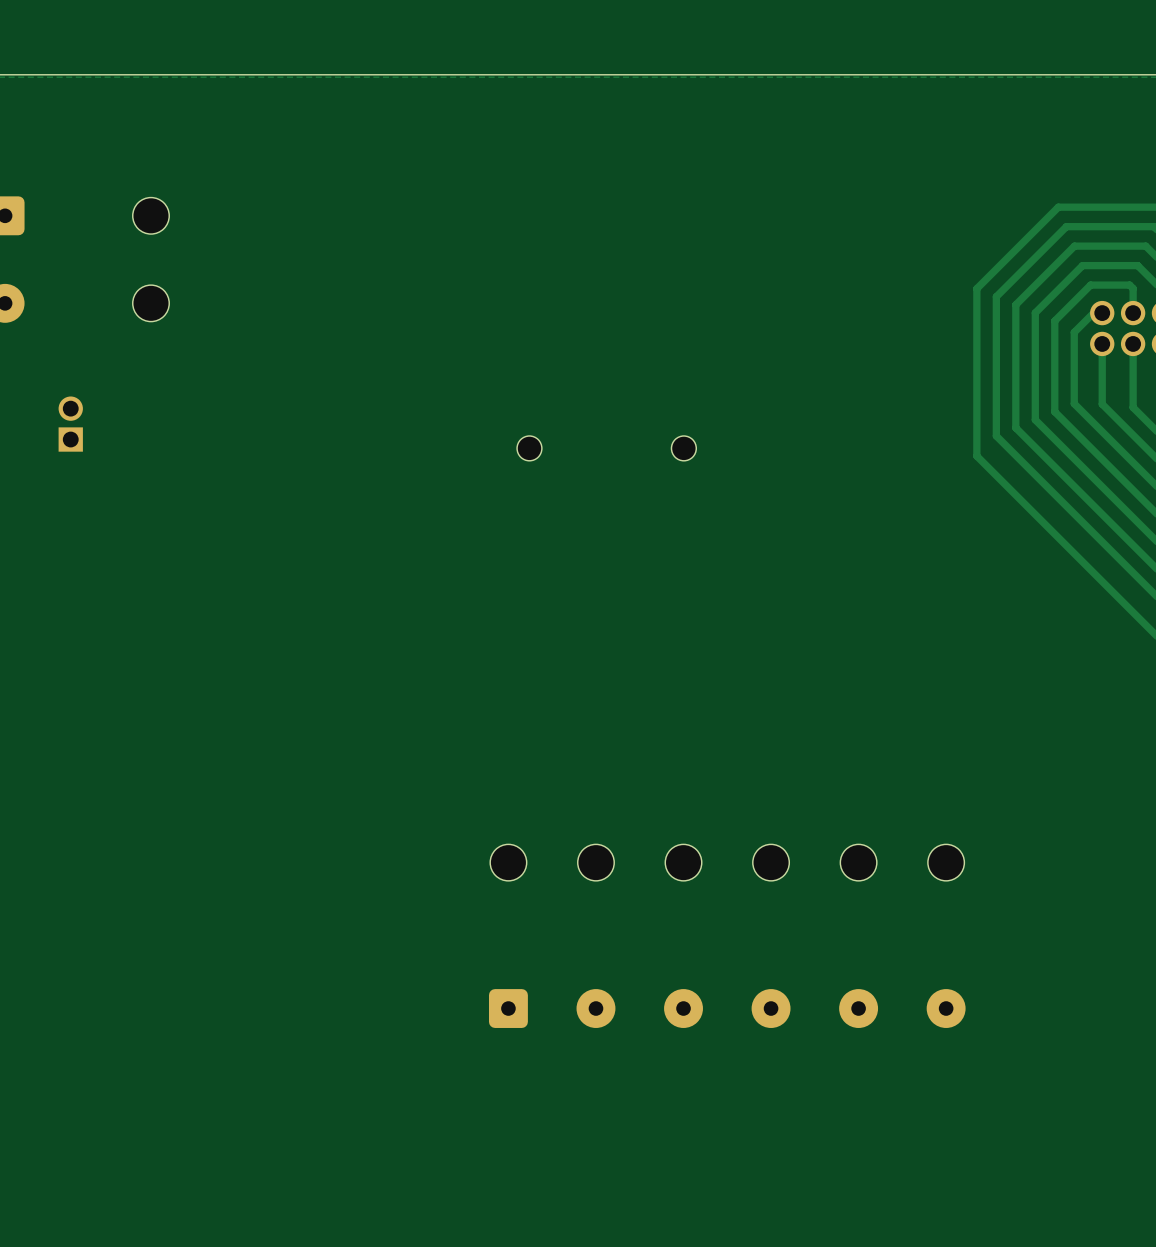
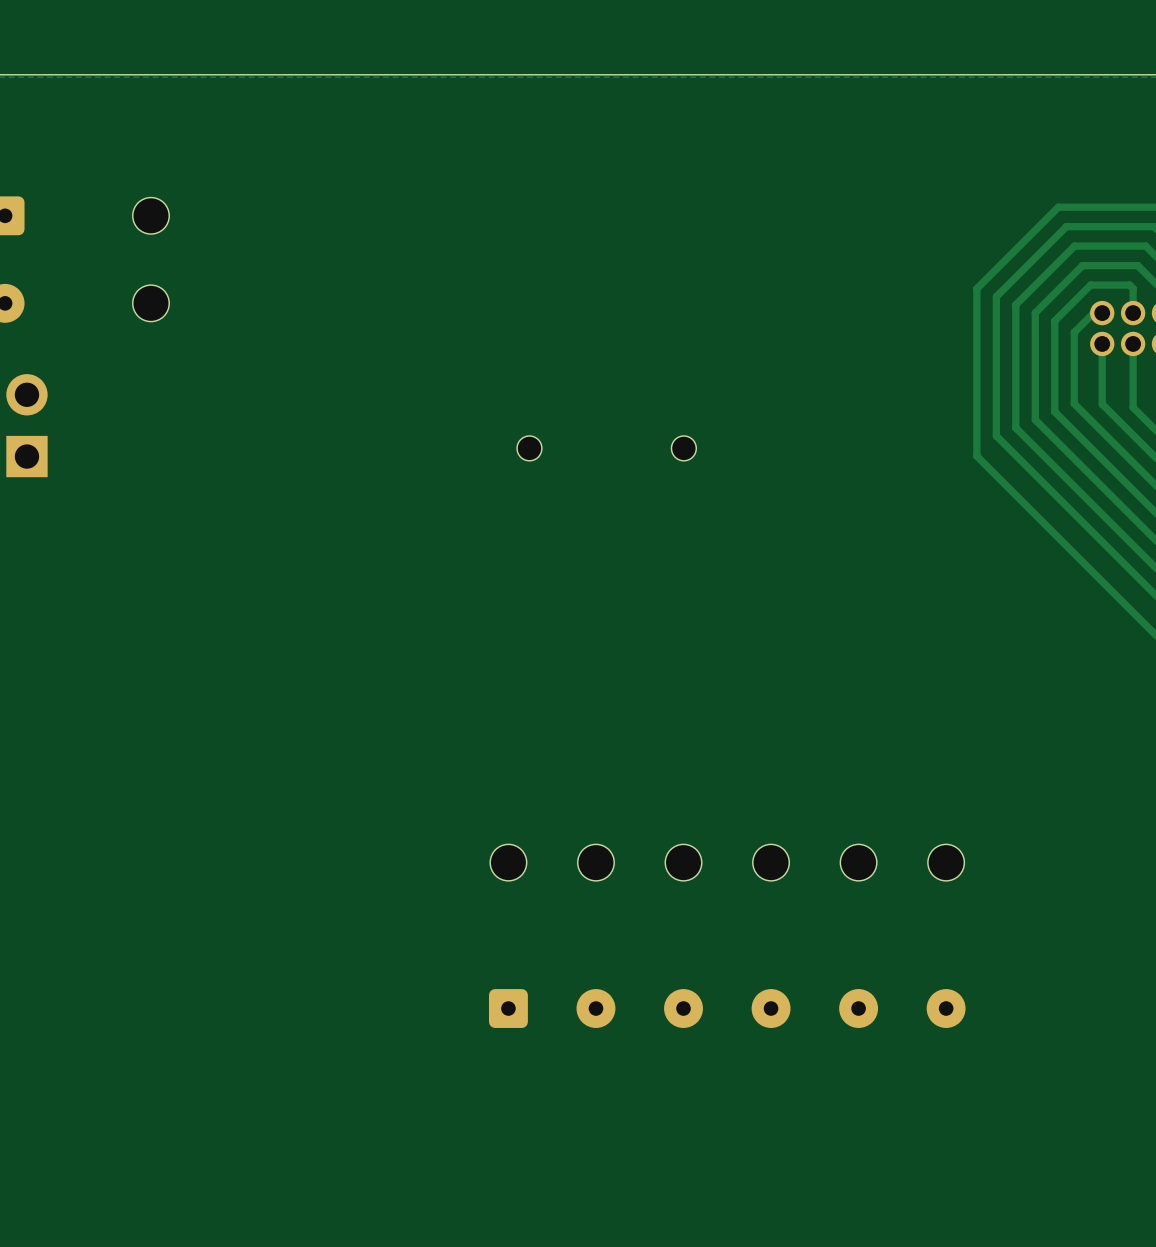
part: (70, 424) -> none
part: none -> (26, 425)

